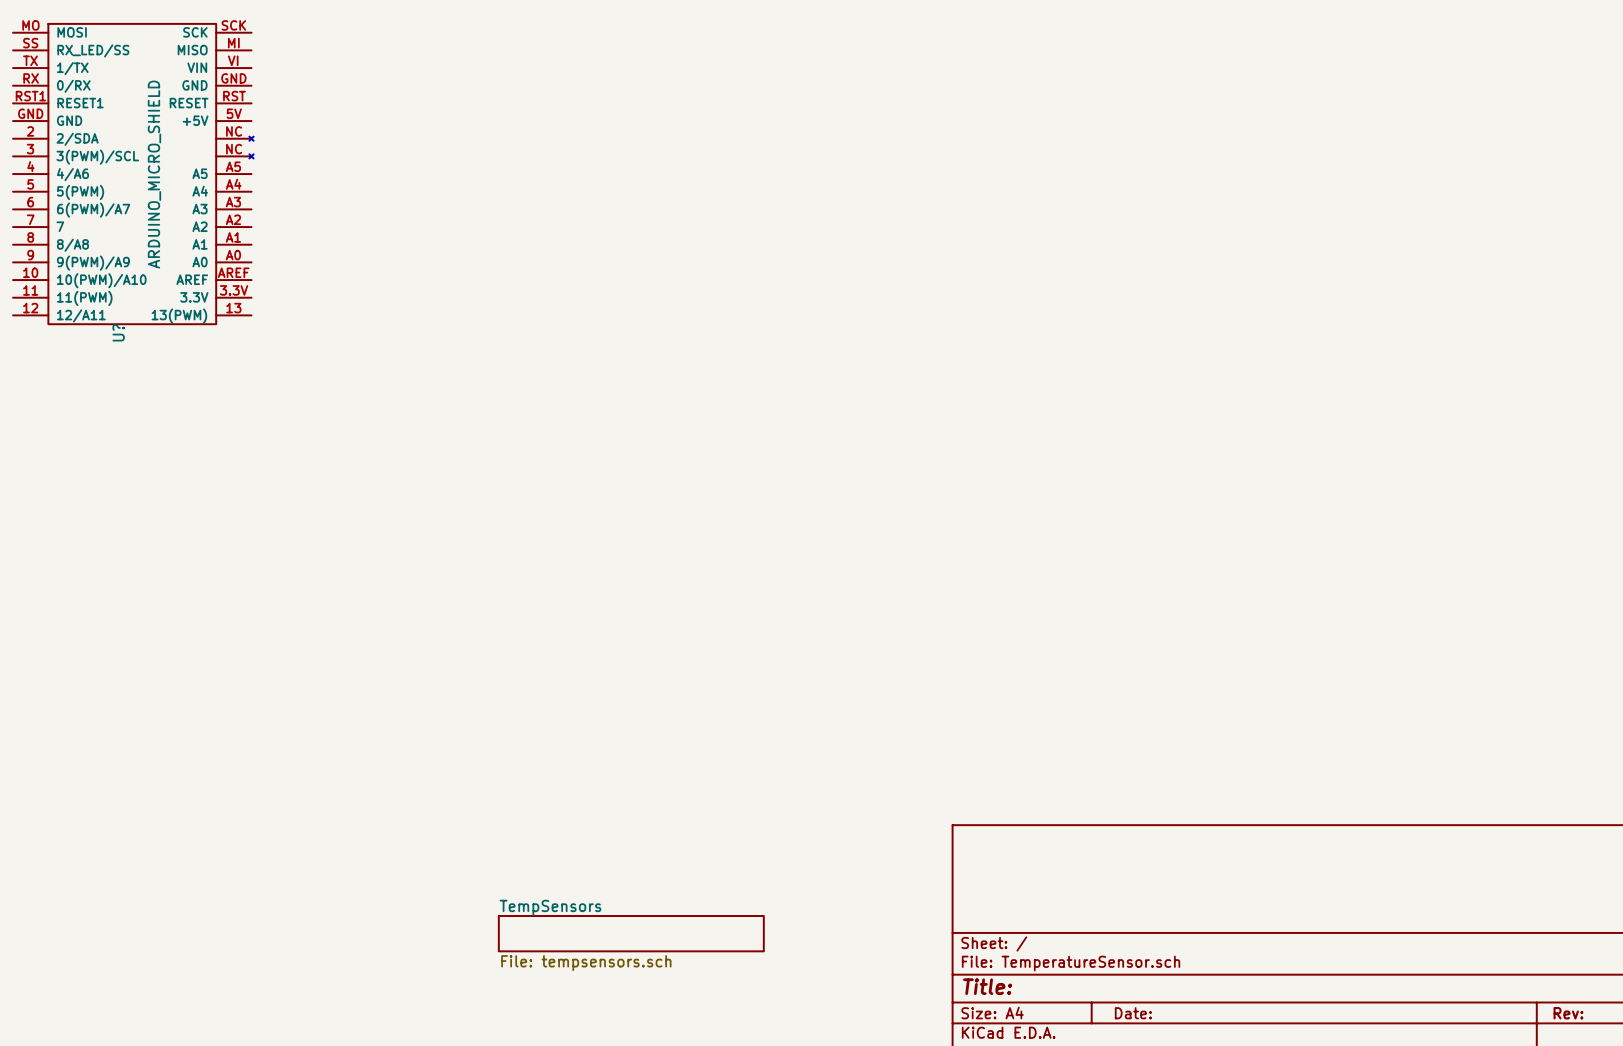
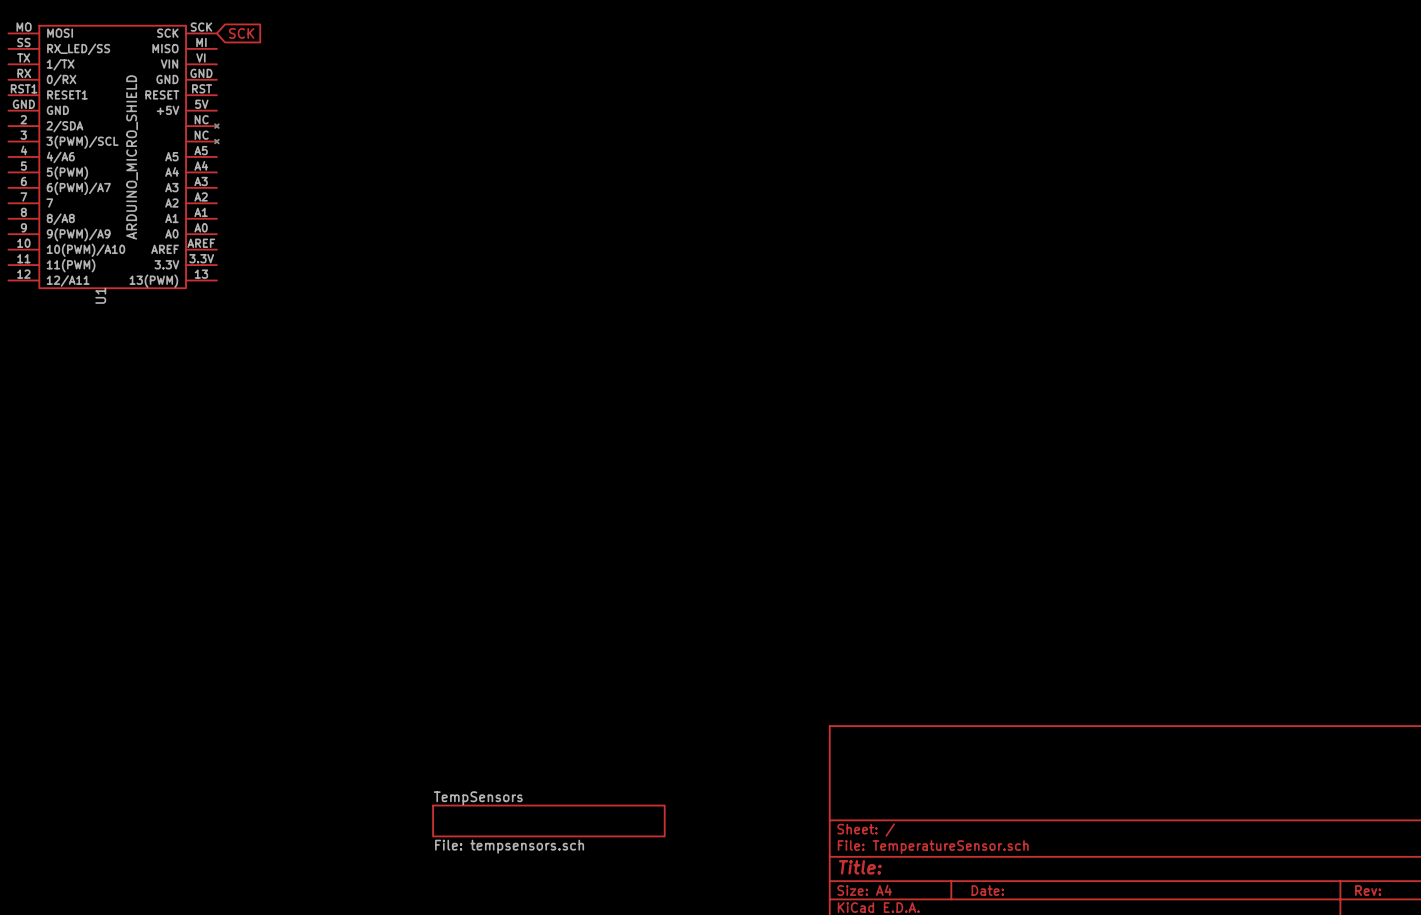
global label: none -> SCK (241, 33)
U? name: U? (118, 332) -> U1 (100, 295)

